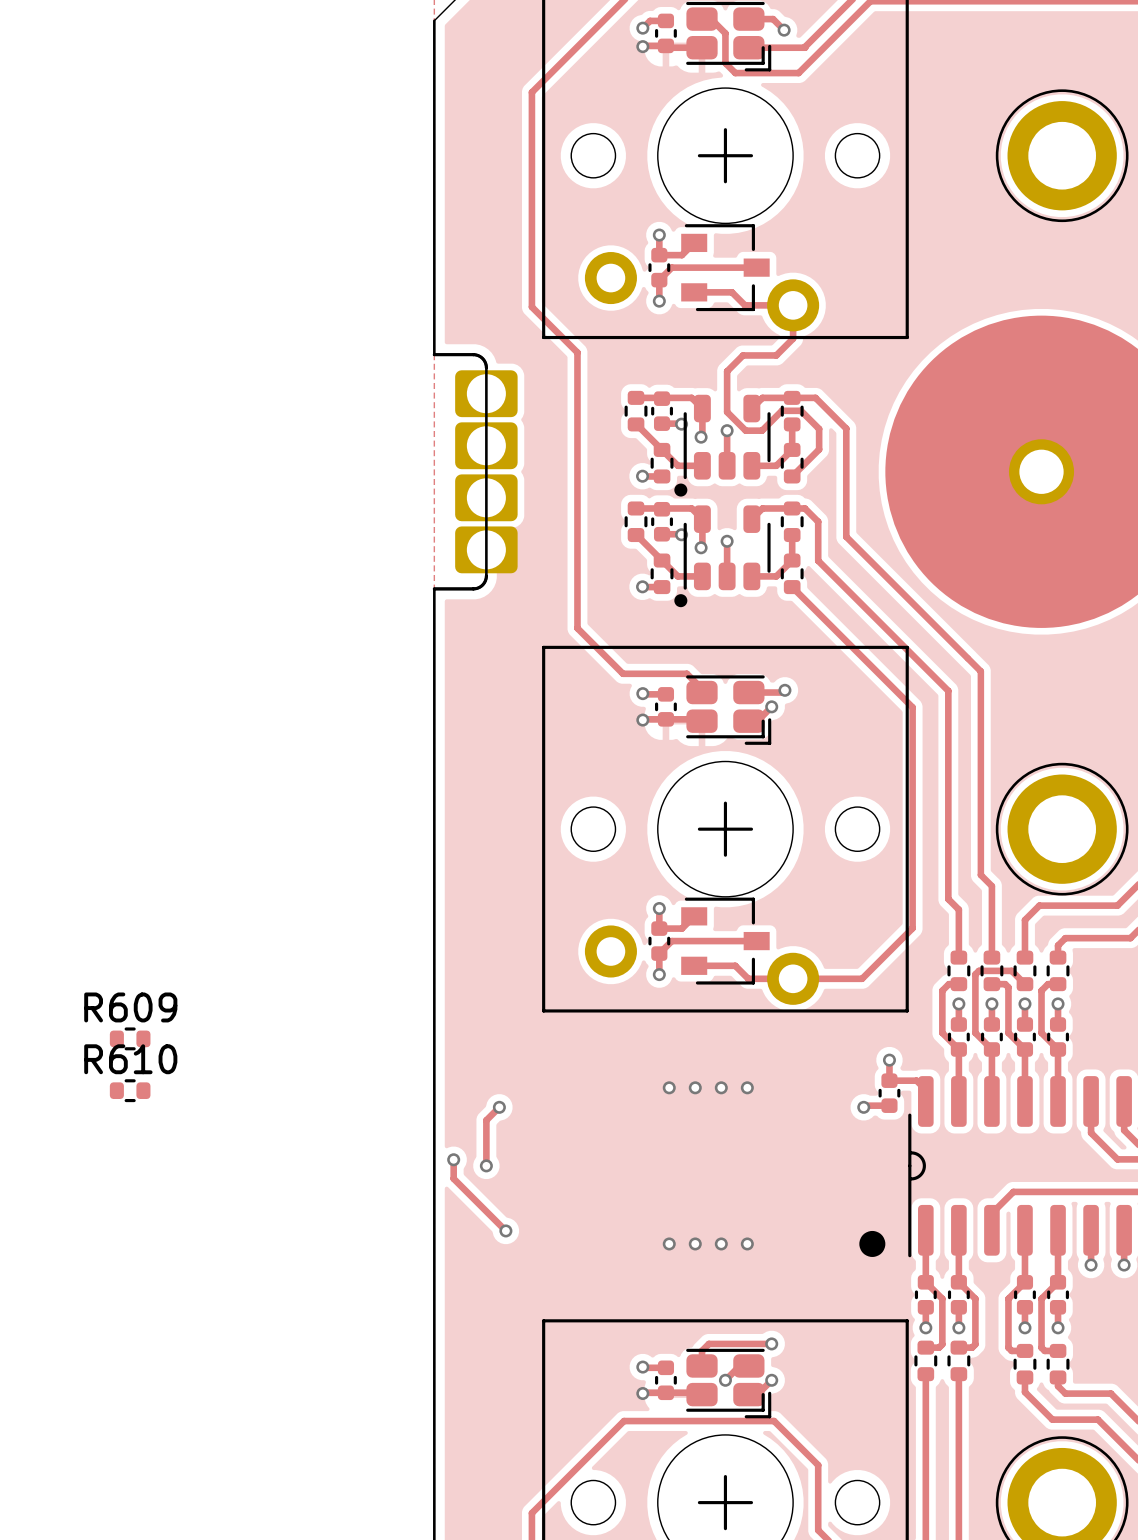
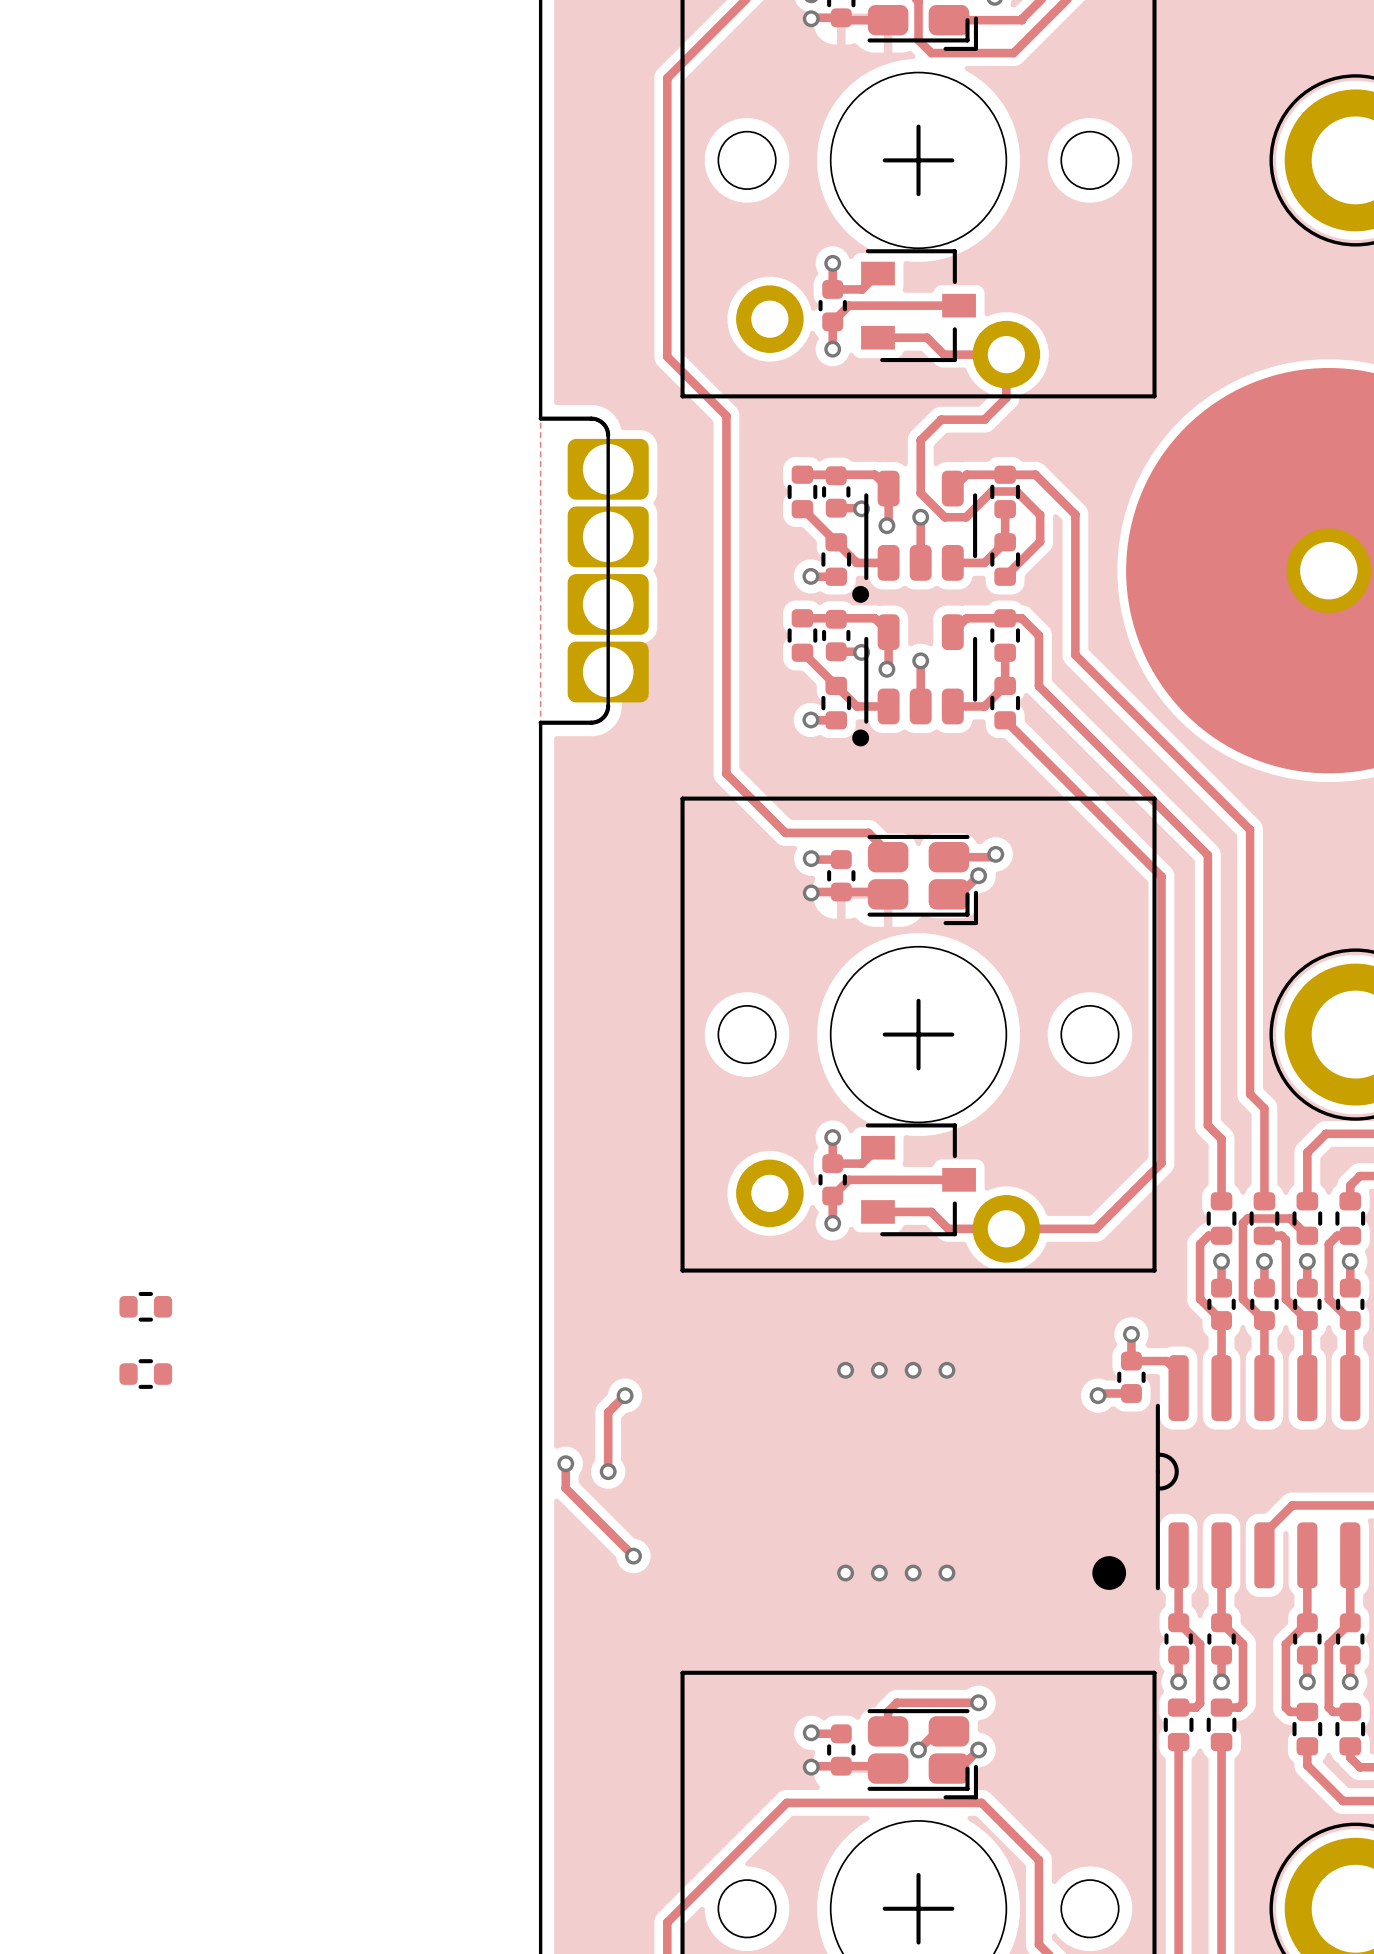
R609 name: R609 (130, 1007) -> none
R610 name: R610 (130, 1059) -> none

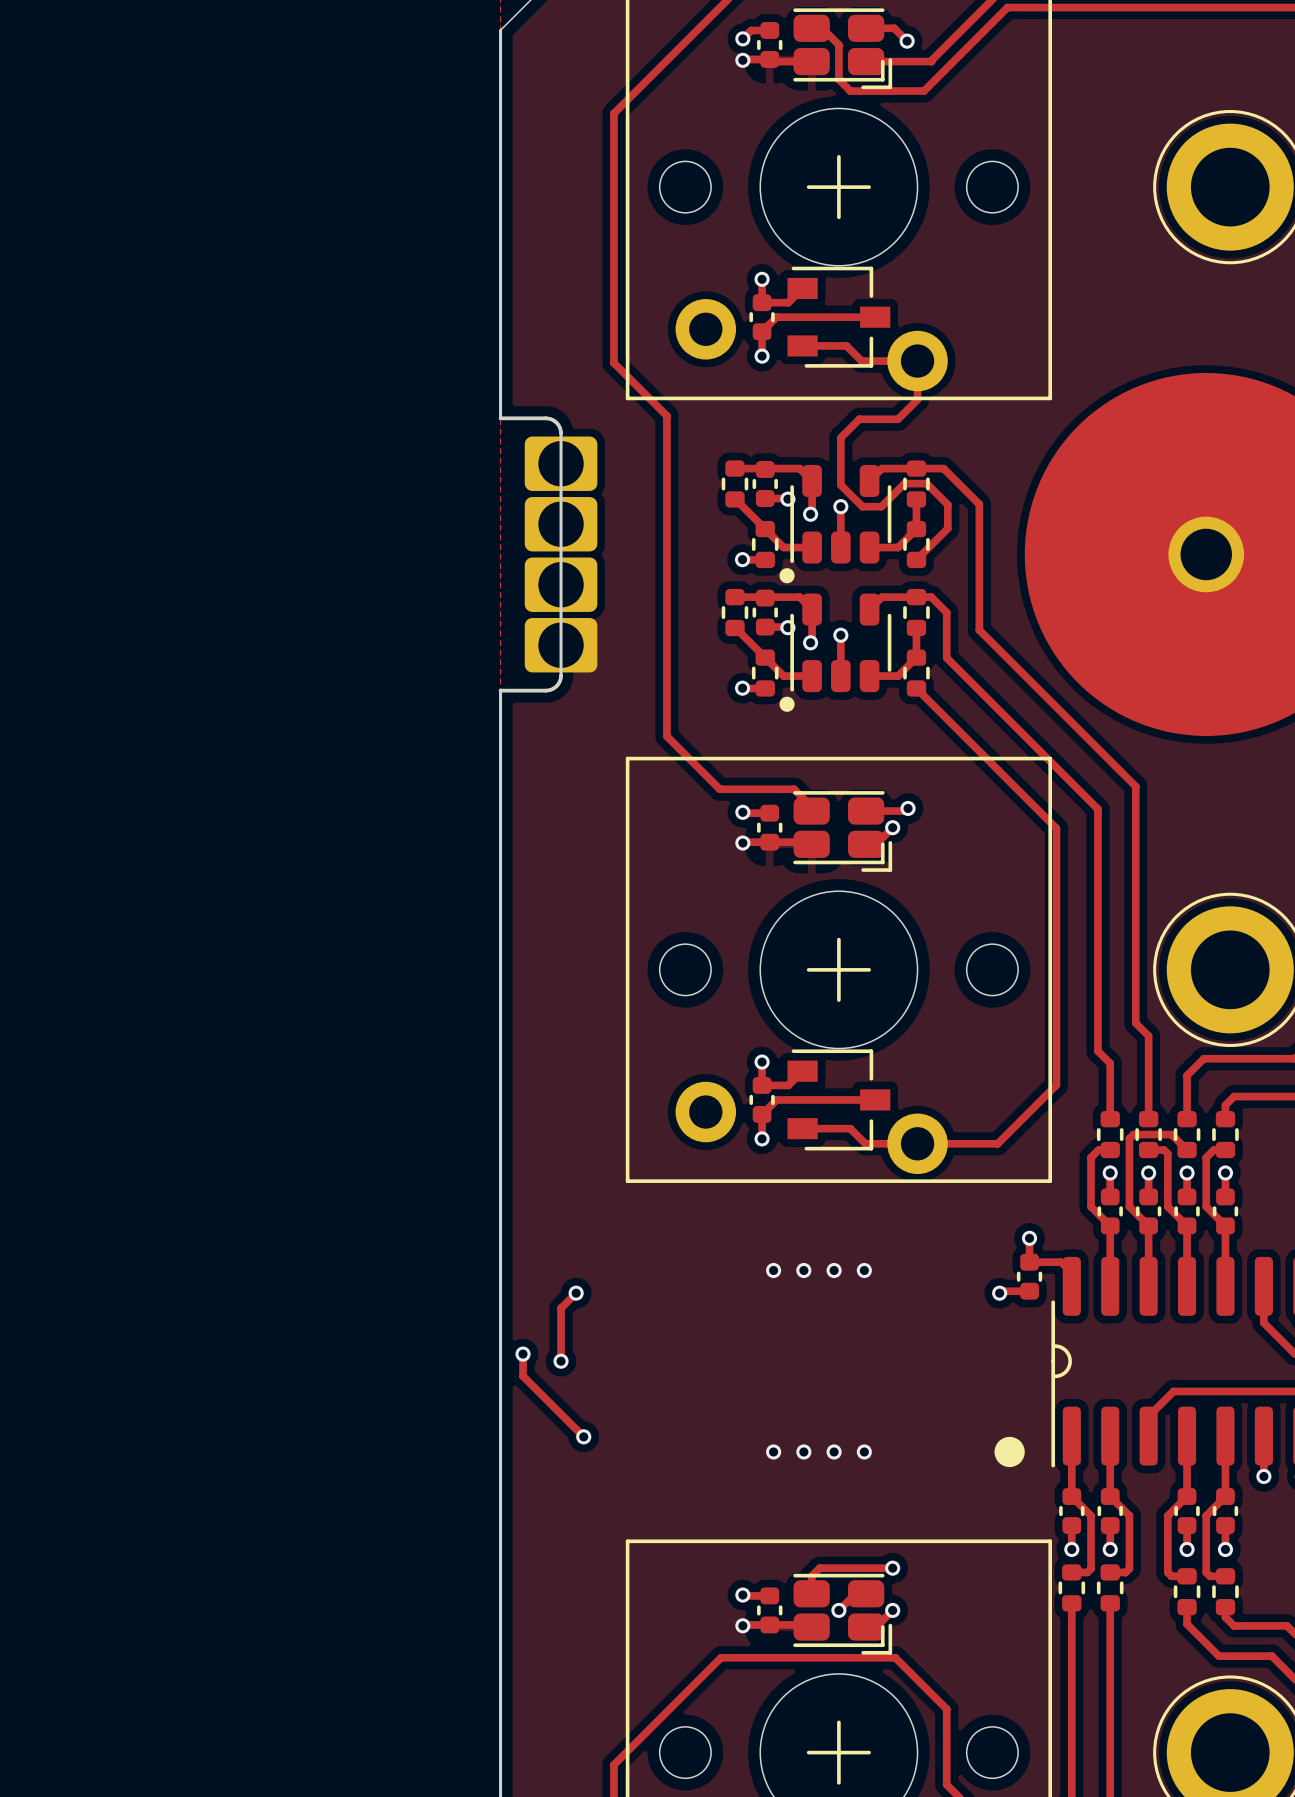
part: (145, 1306) -> none
part: (145, 1374) -> none

